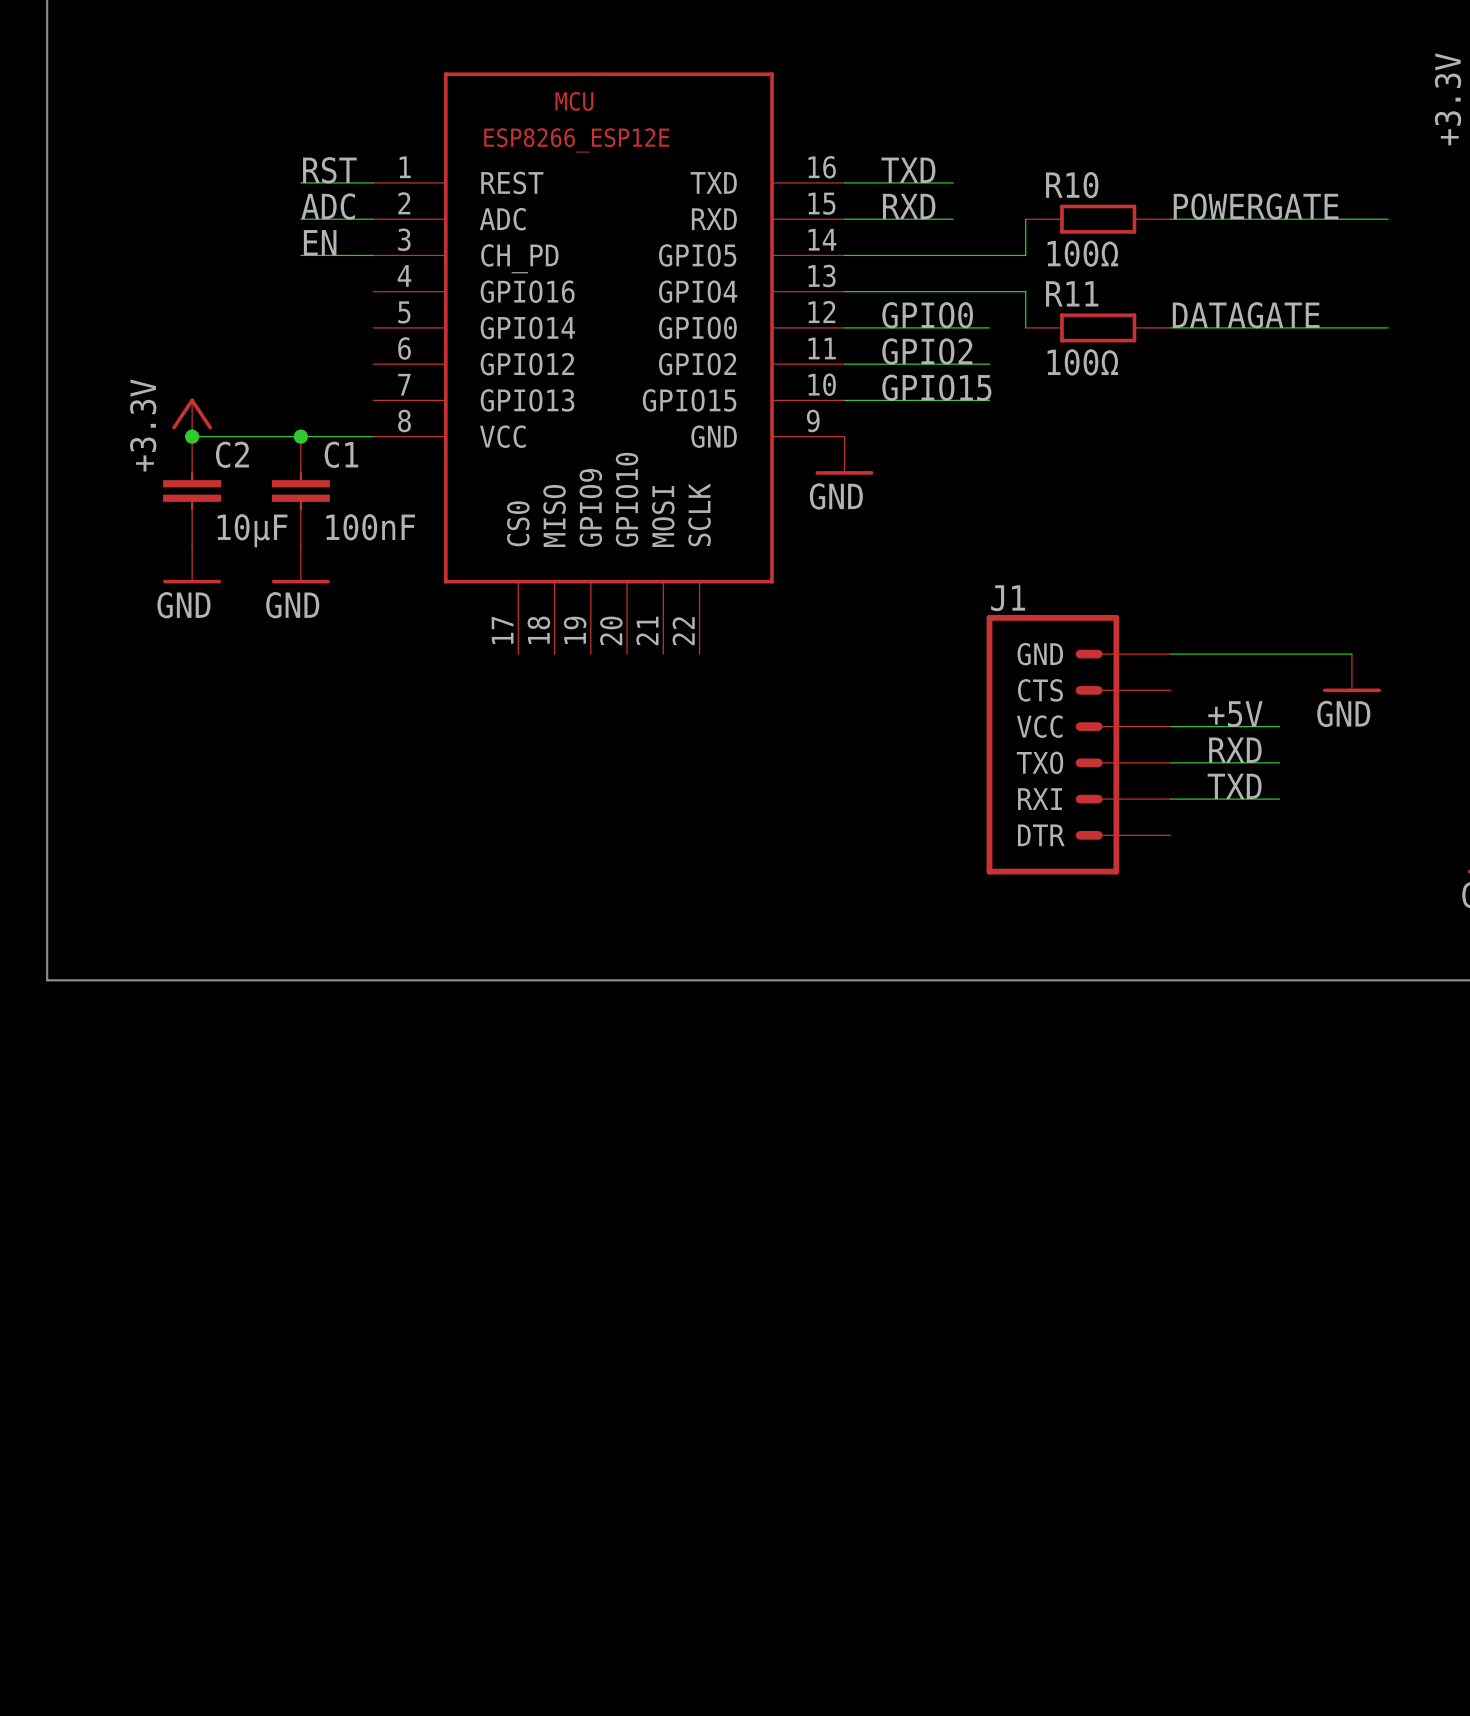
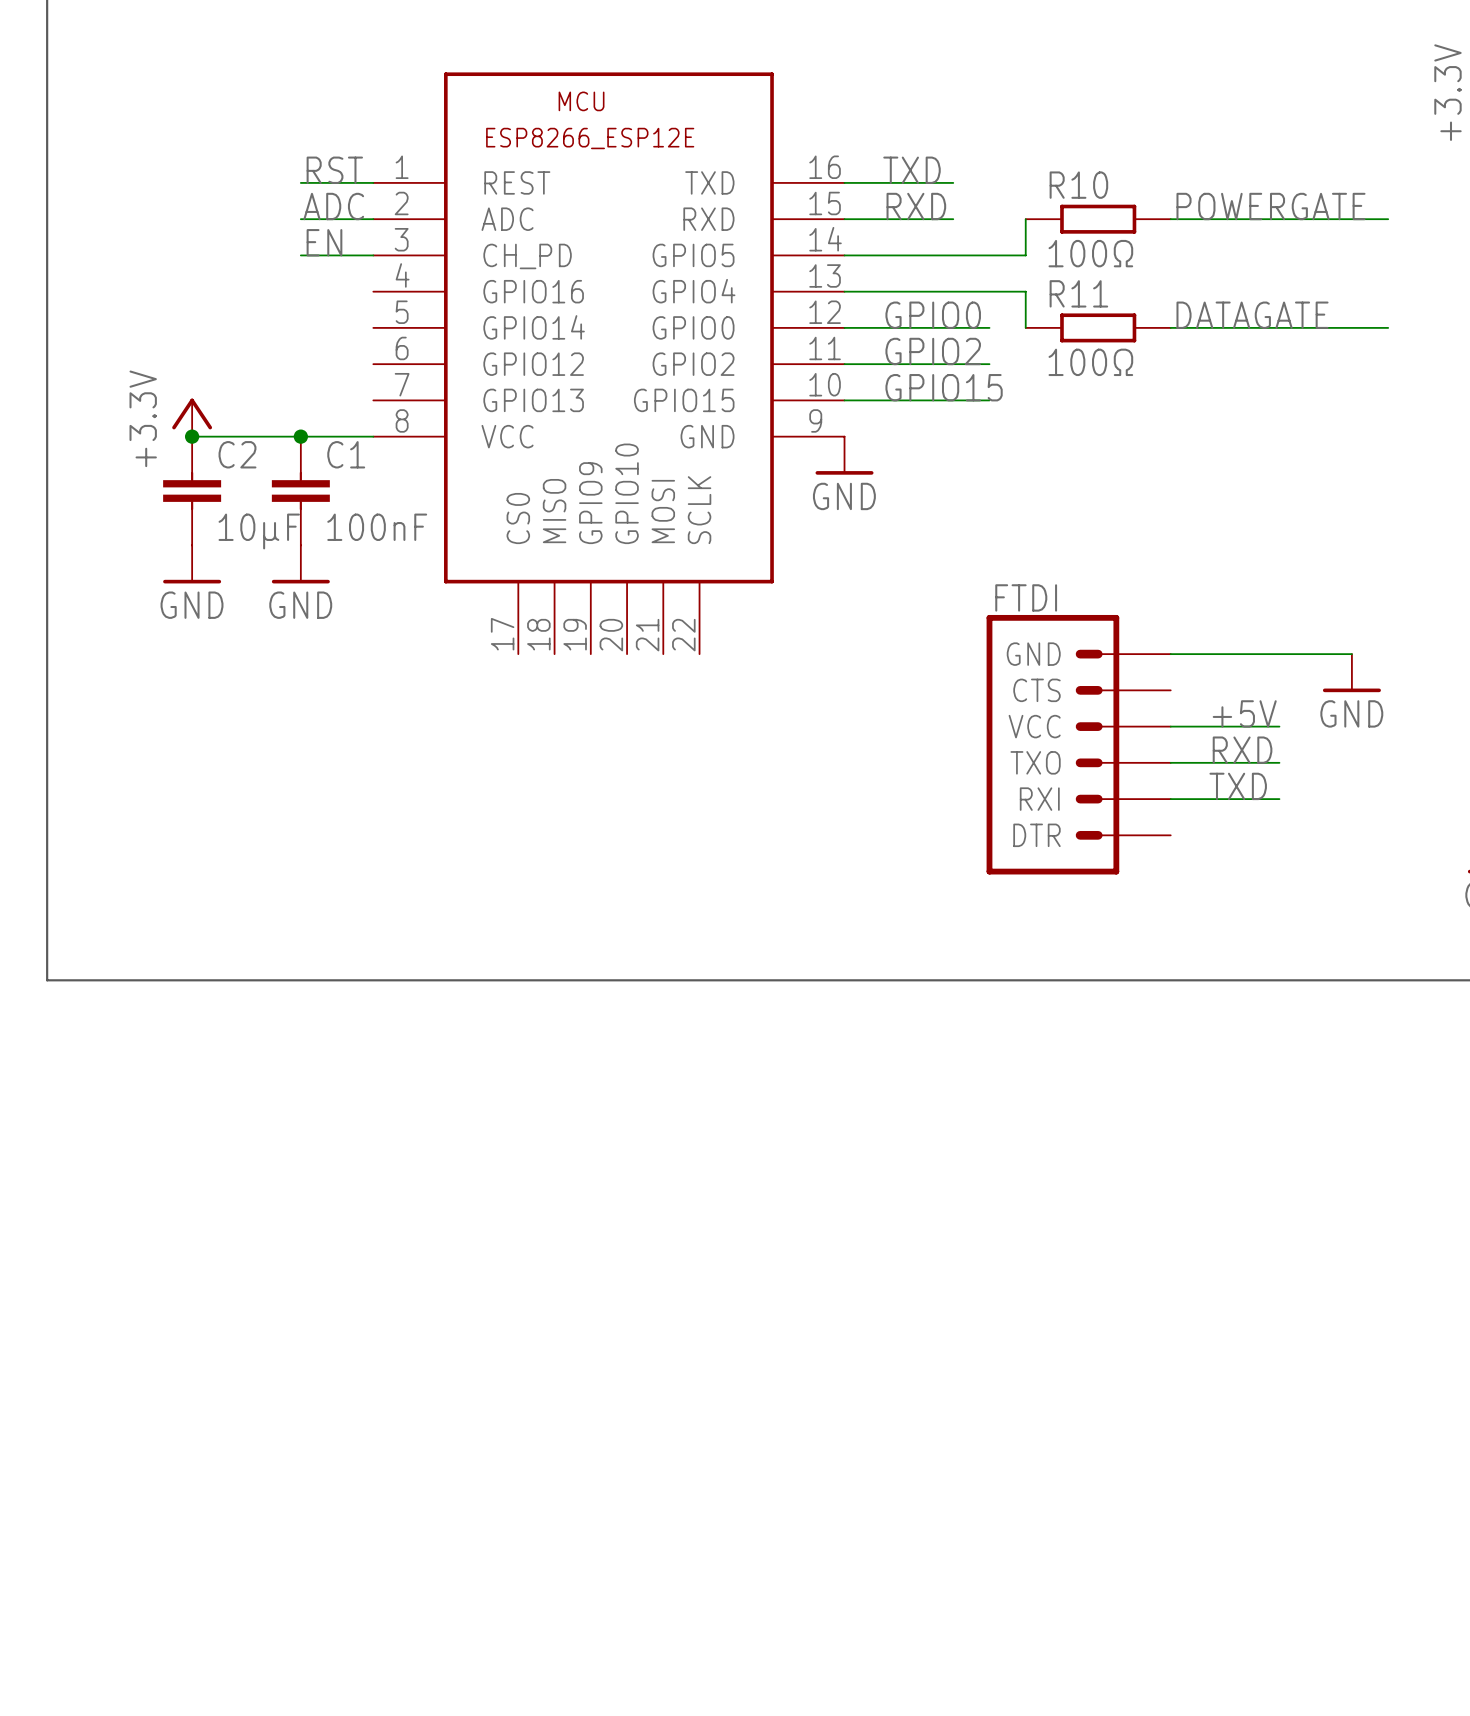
J1 name: J1 (1008, 598) -> FTDI (1026, 597)

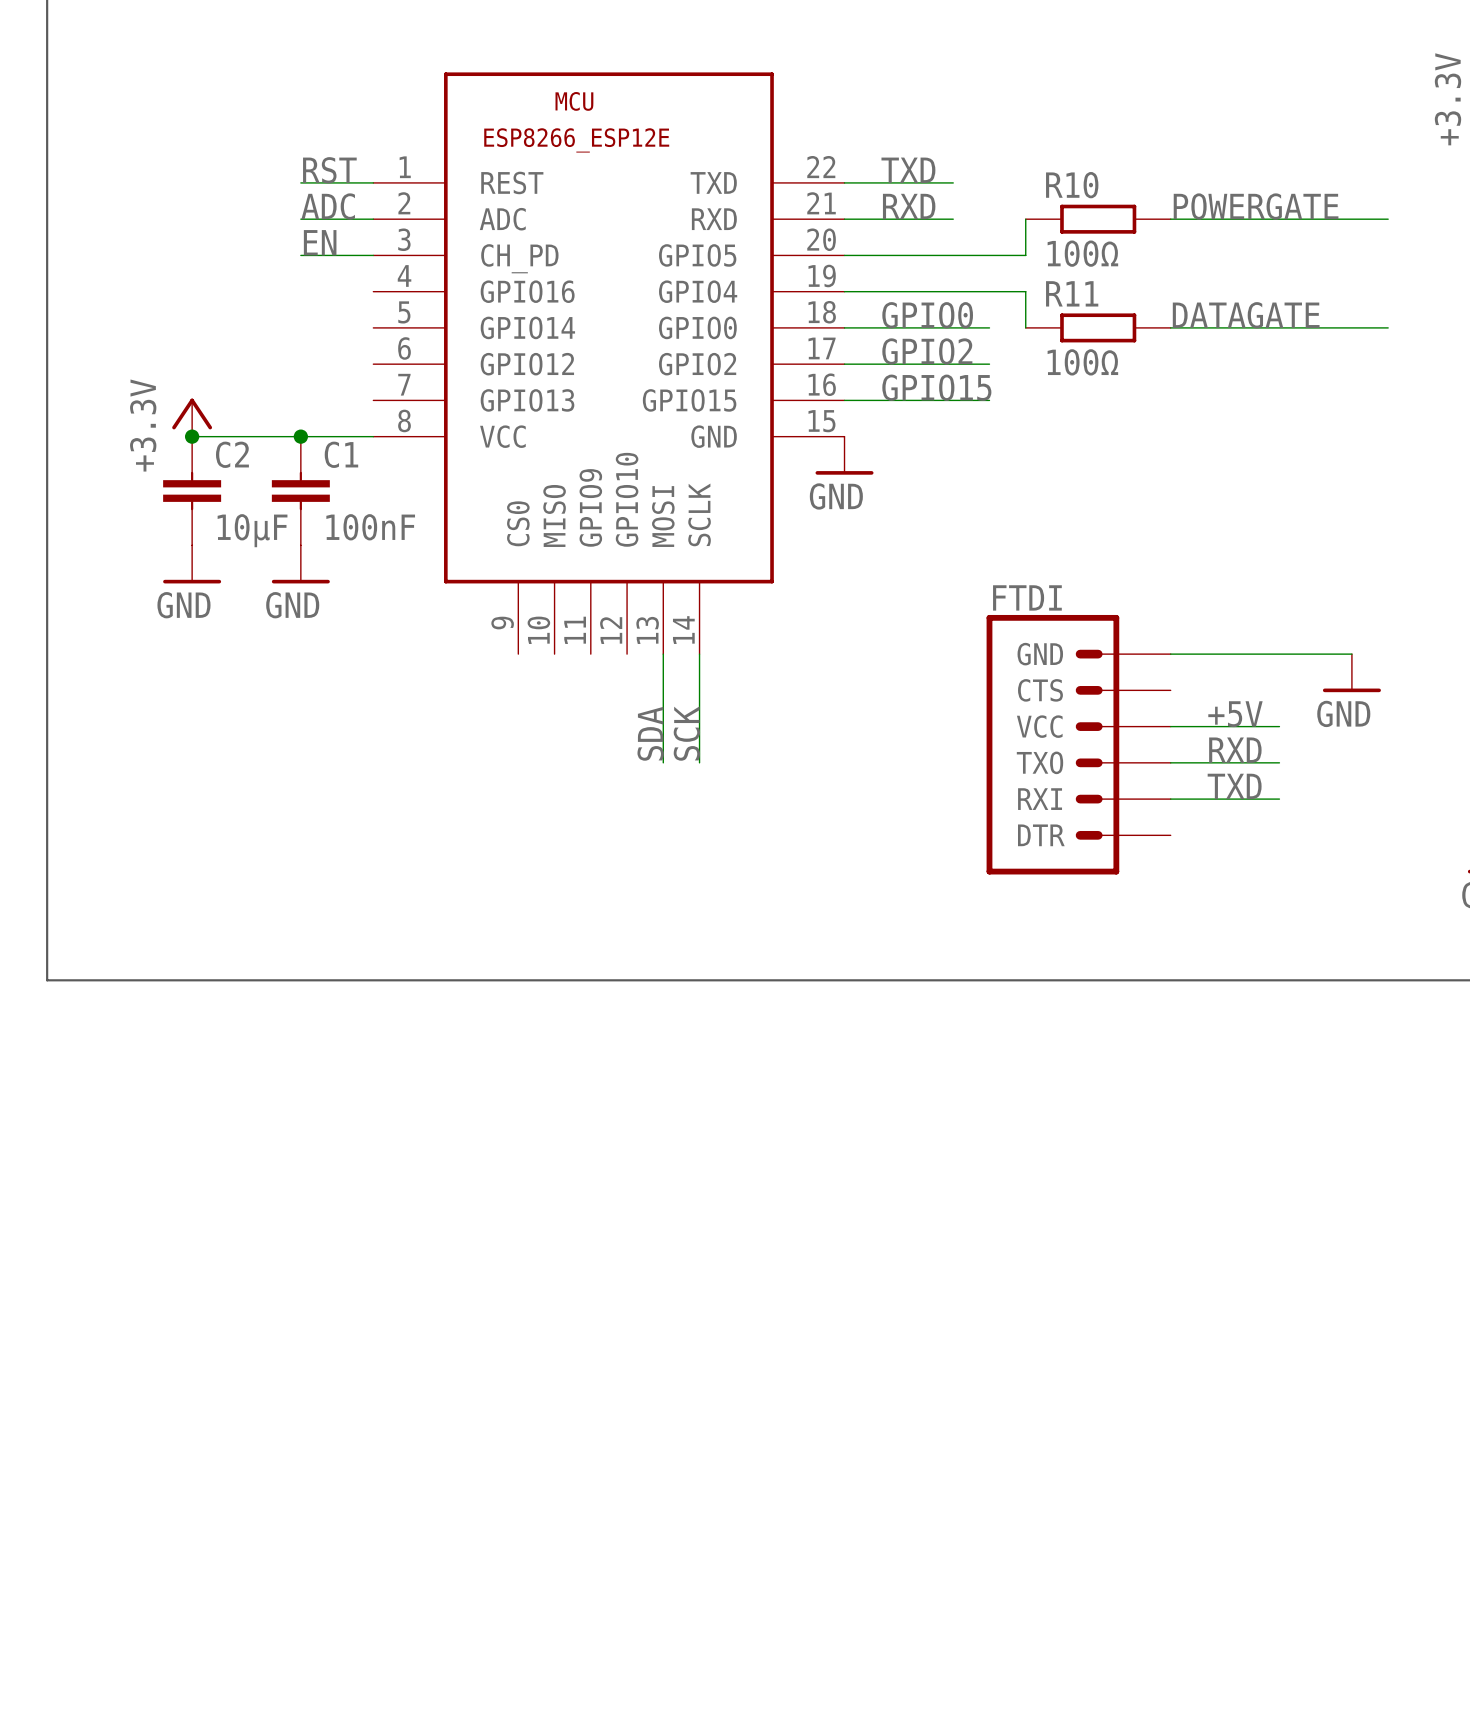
MCU symbol: [373, 72, 845, 655] -> [373, 72, 845, 655]
wire: none -> (663, 654) (663, 762)
wire: none -> (699, 654) (699, 762)
label: none -> SCK (686, 733)
label: none -> SDA (650, 733)

